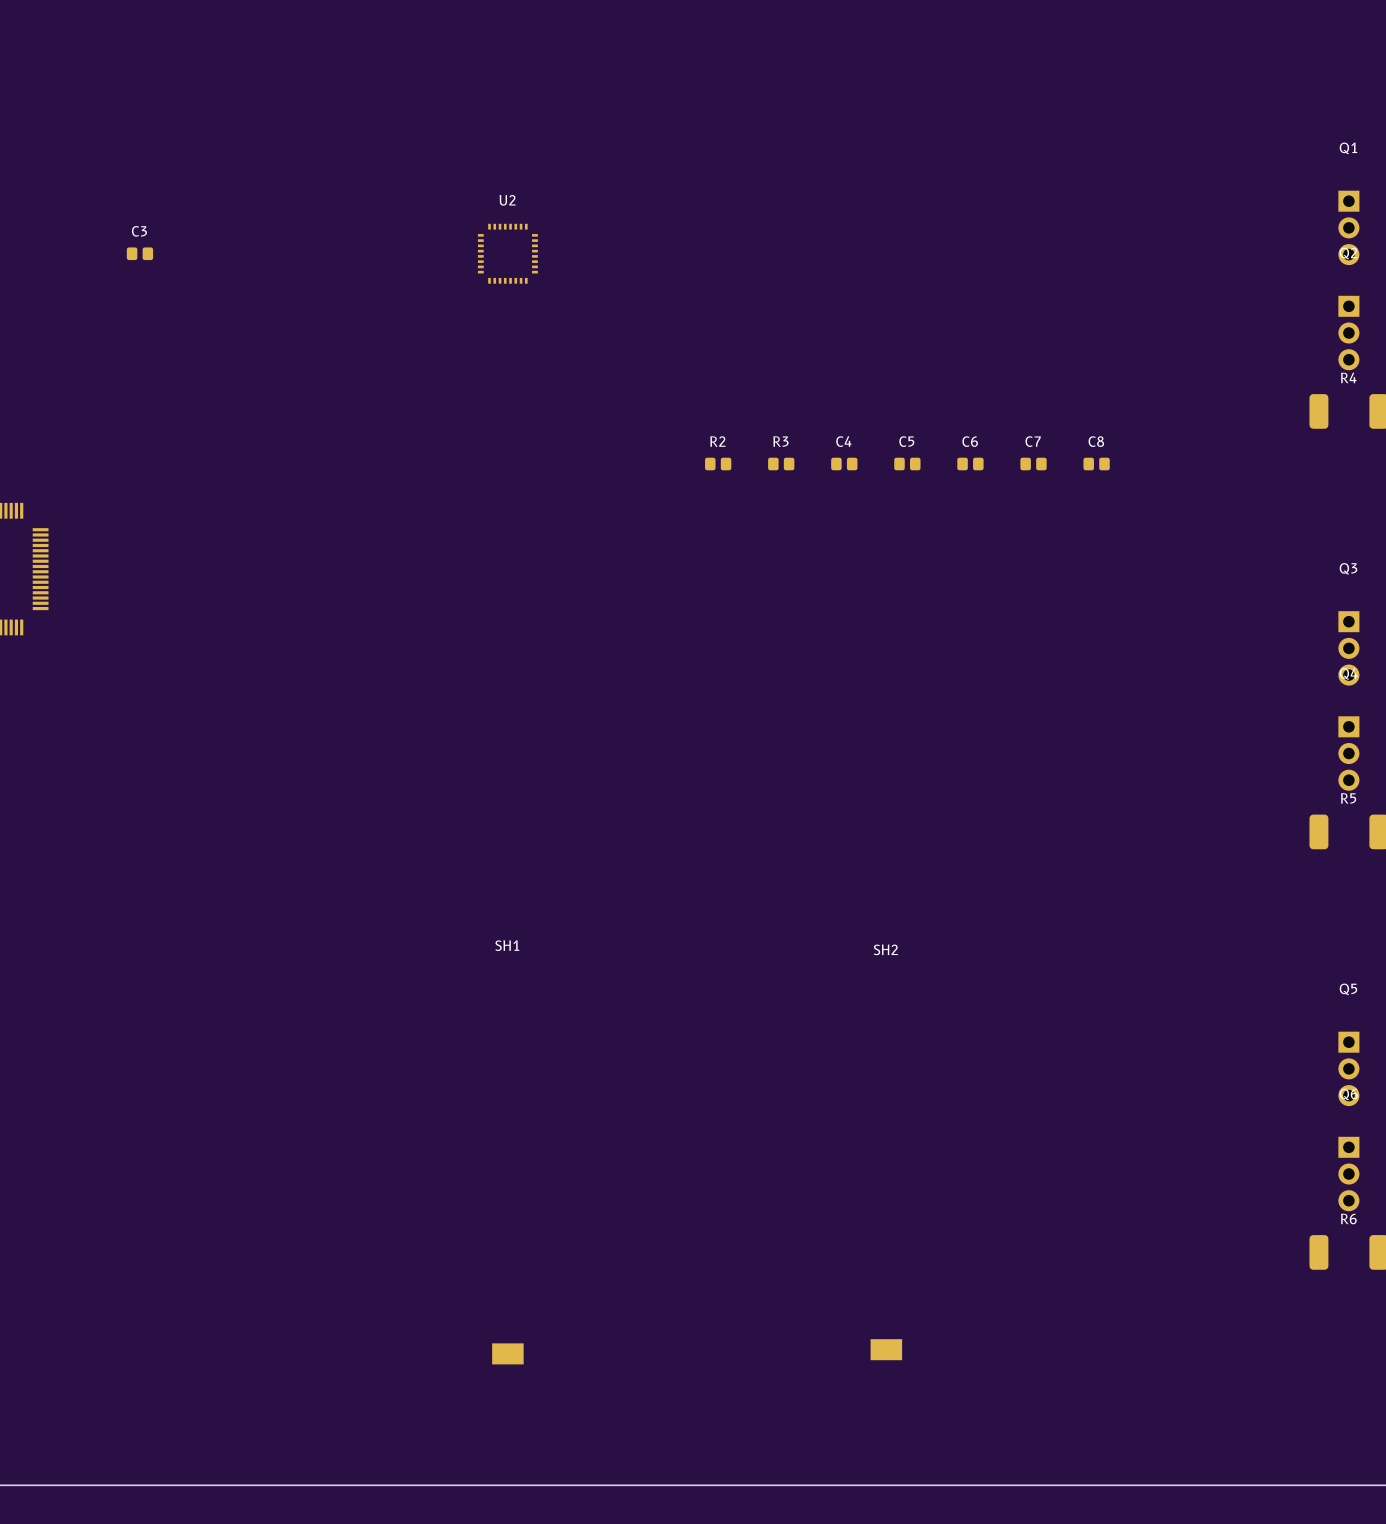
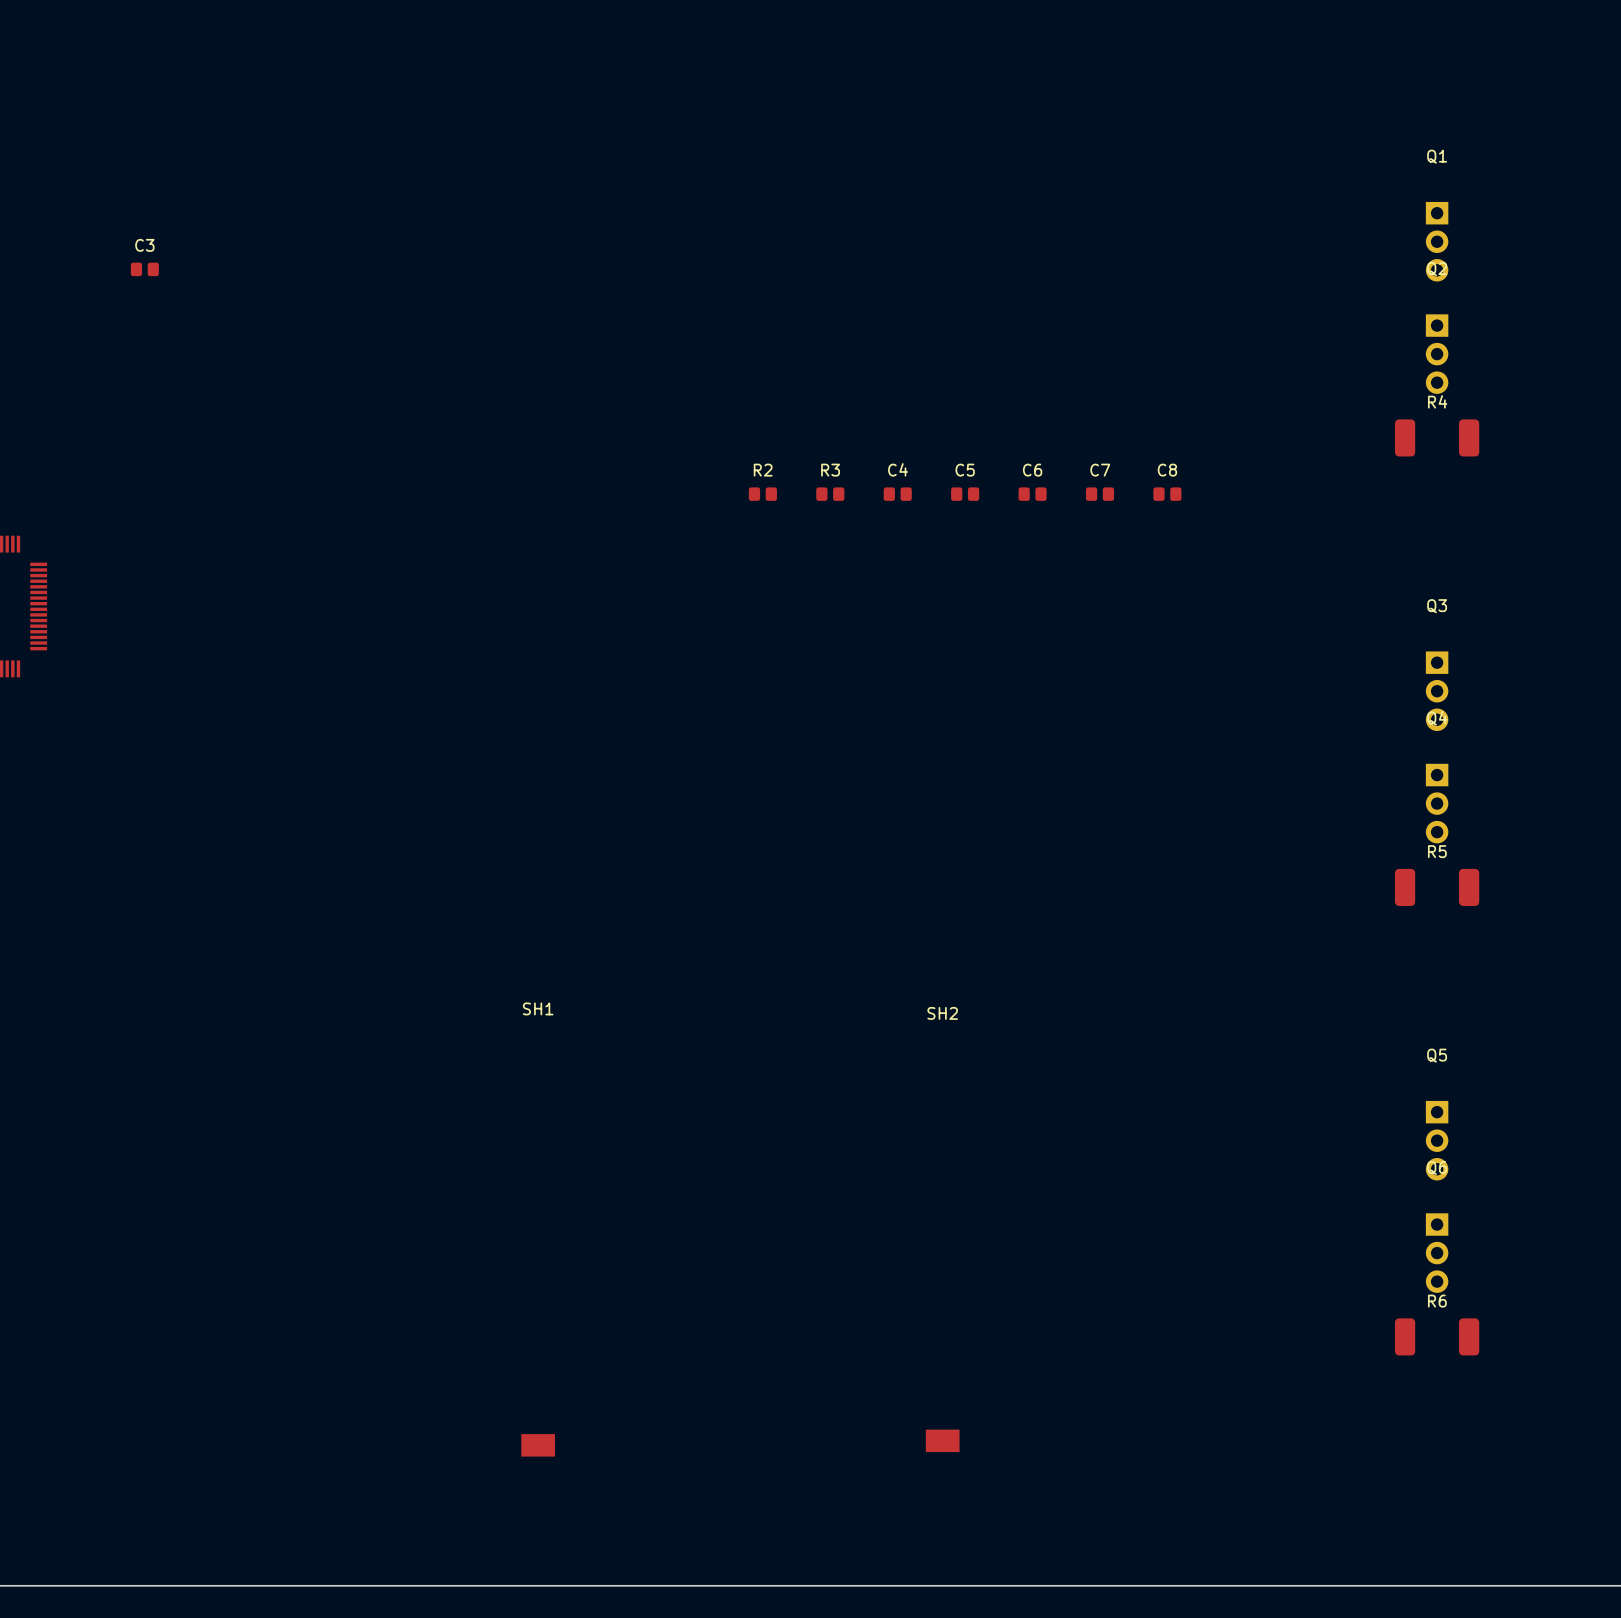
U2: (507, 253) -> none

